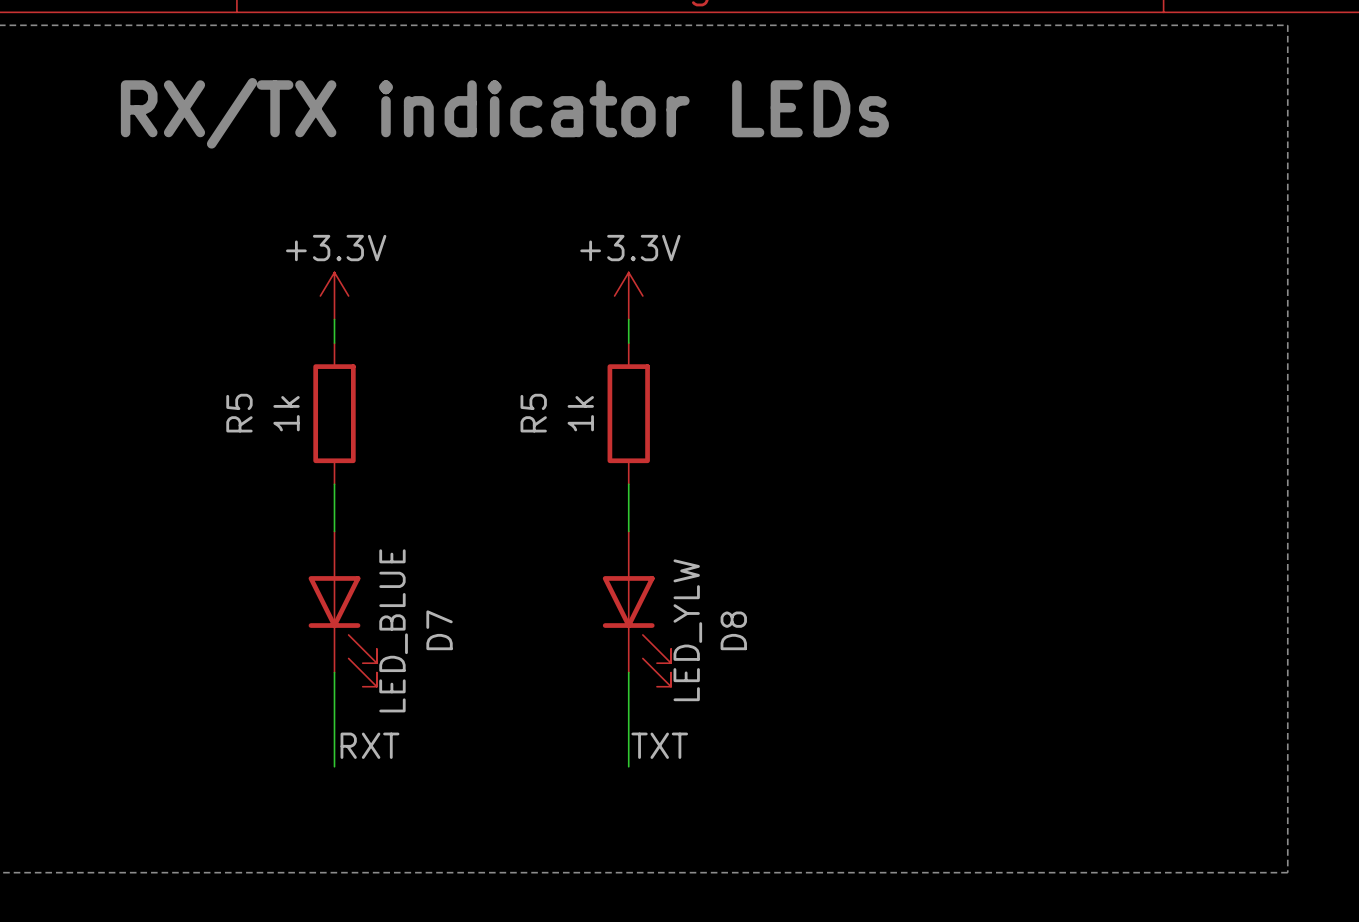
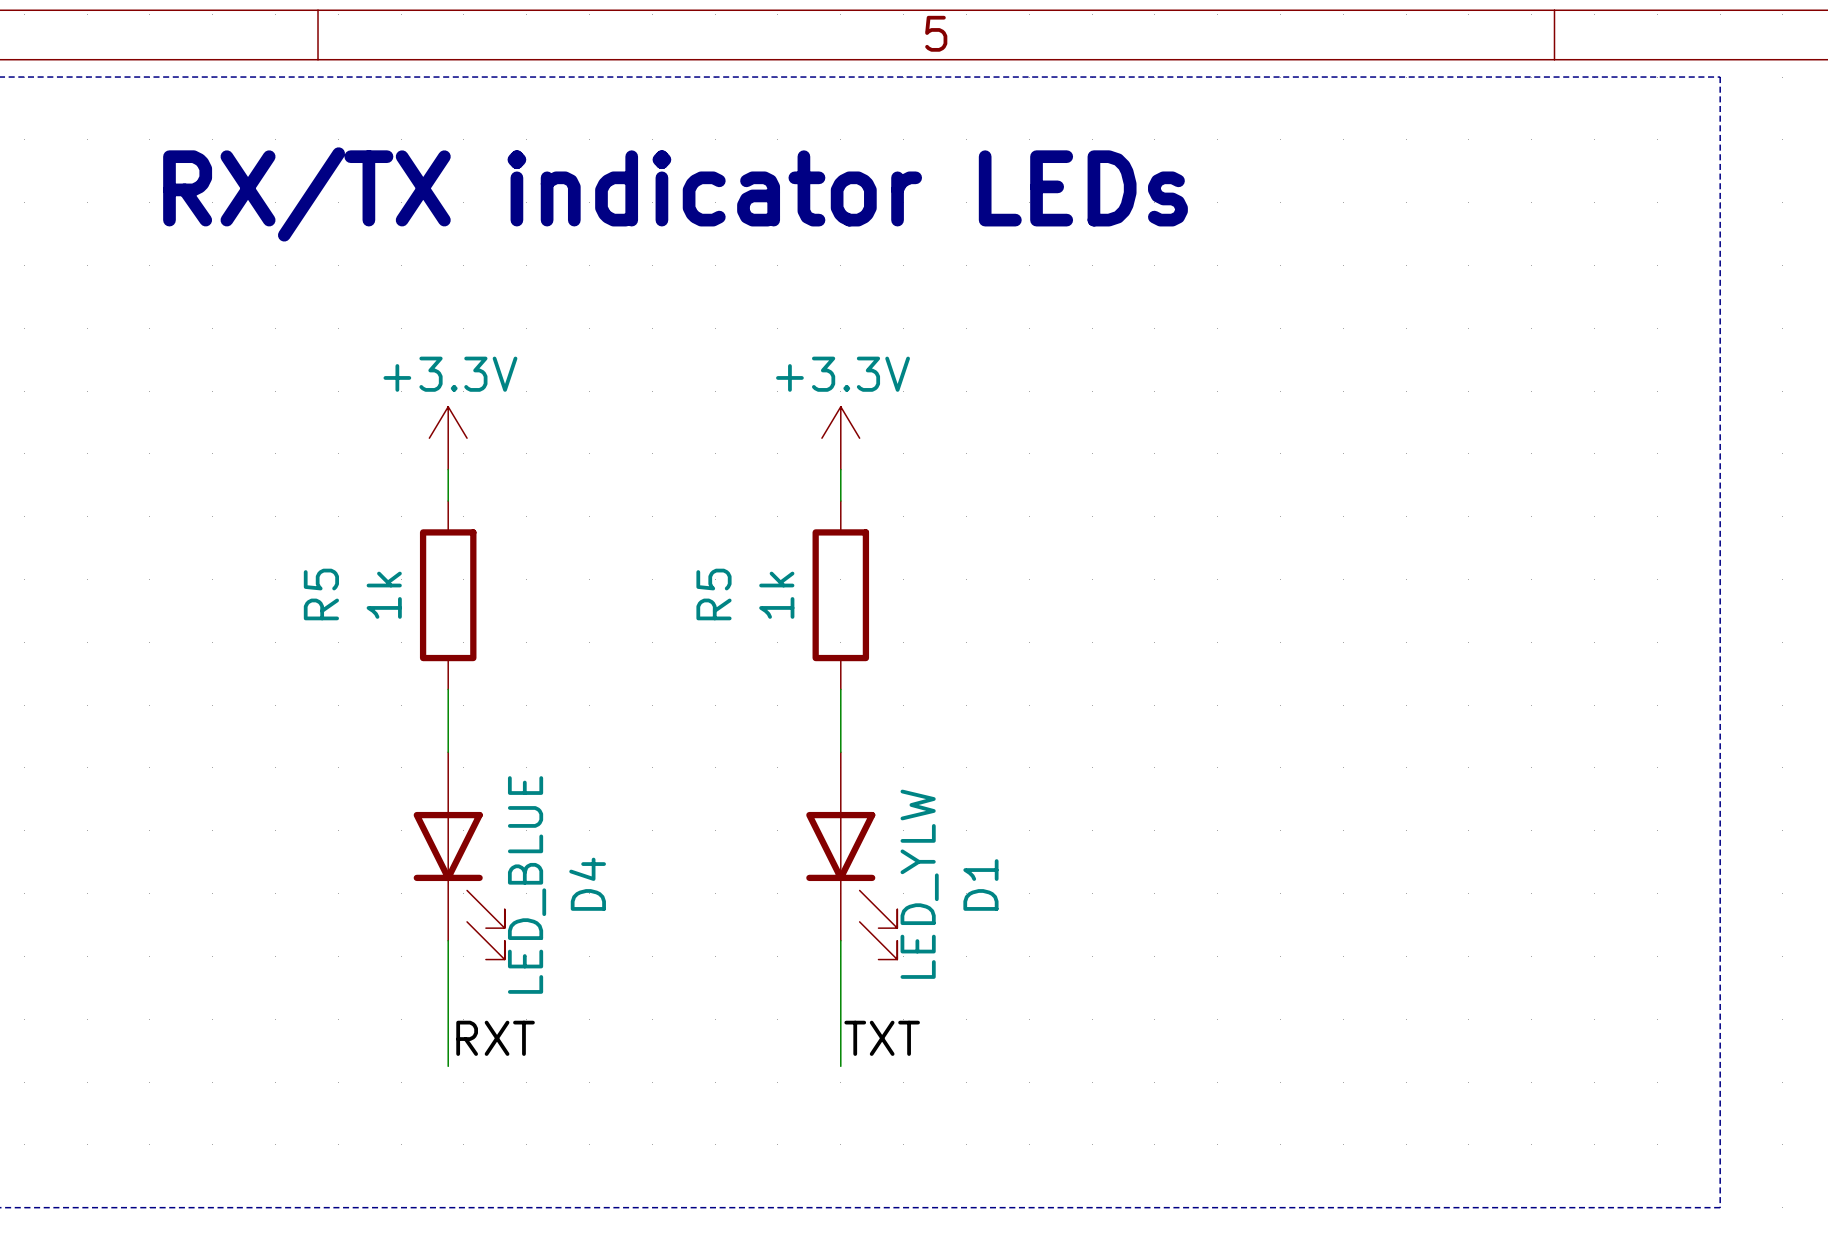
D7 name: D7 (439, 630) -> D4 (587, 884)
D8 name: D8 (733, 630) -> D1 (980, 885)

